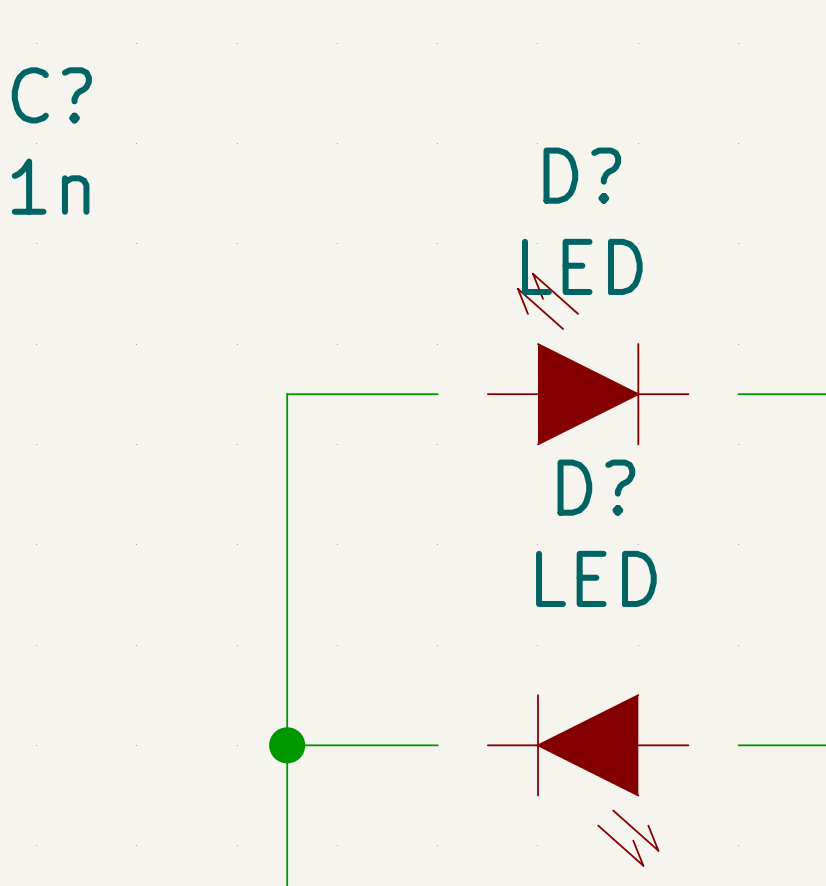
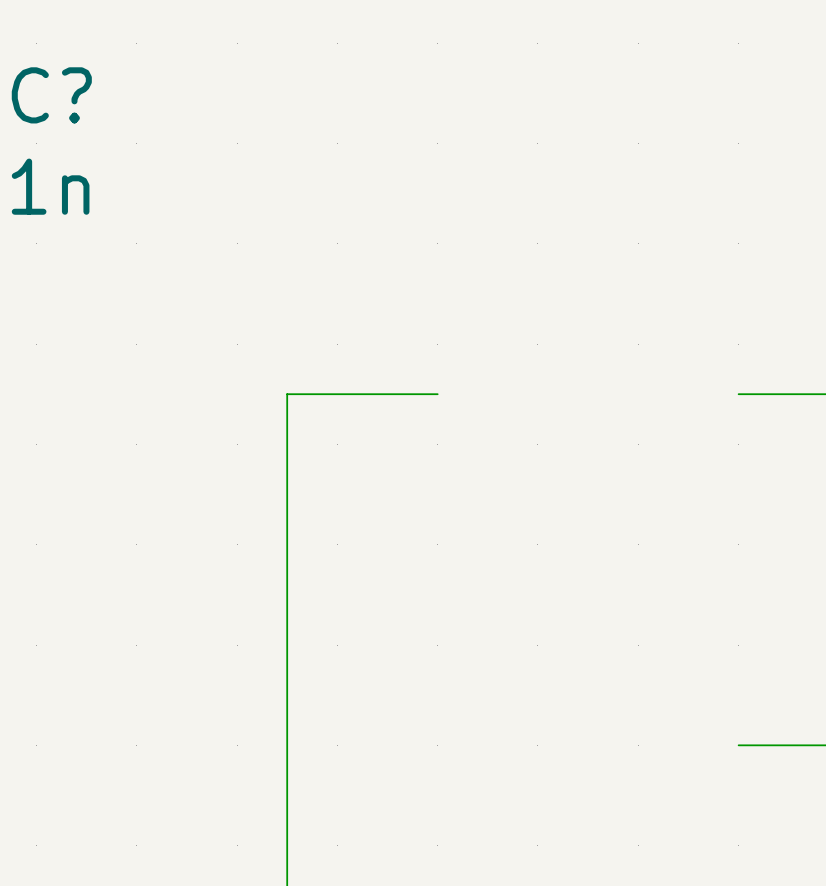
D?: LED (588, 359) -> none
wire: (287, 745) (437, 745) -> none
junction: (287, 745) -> none
D?: LED (588, 780) -> none

